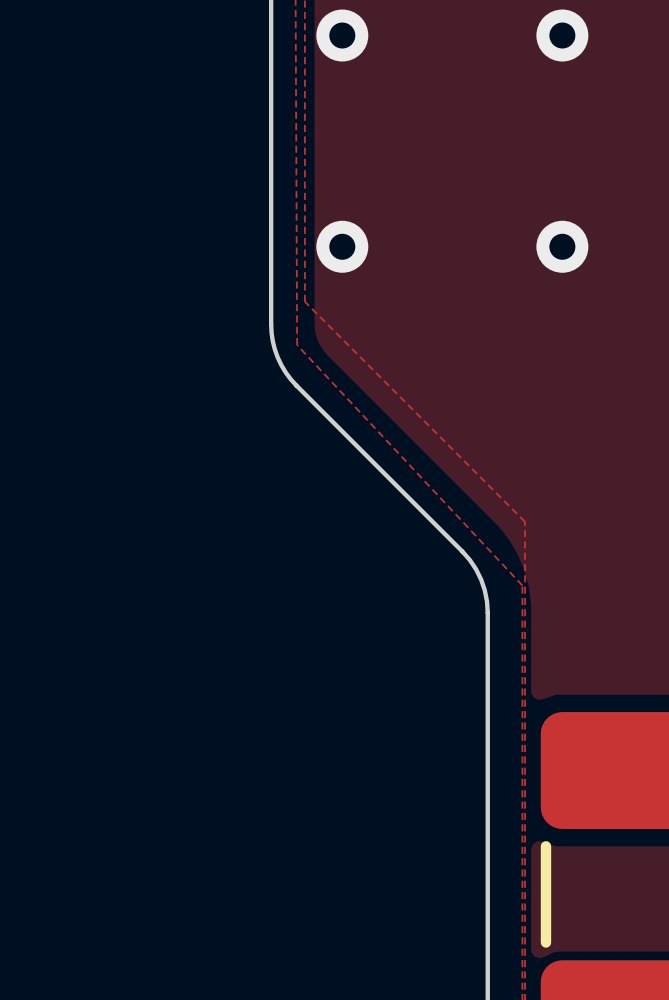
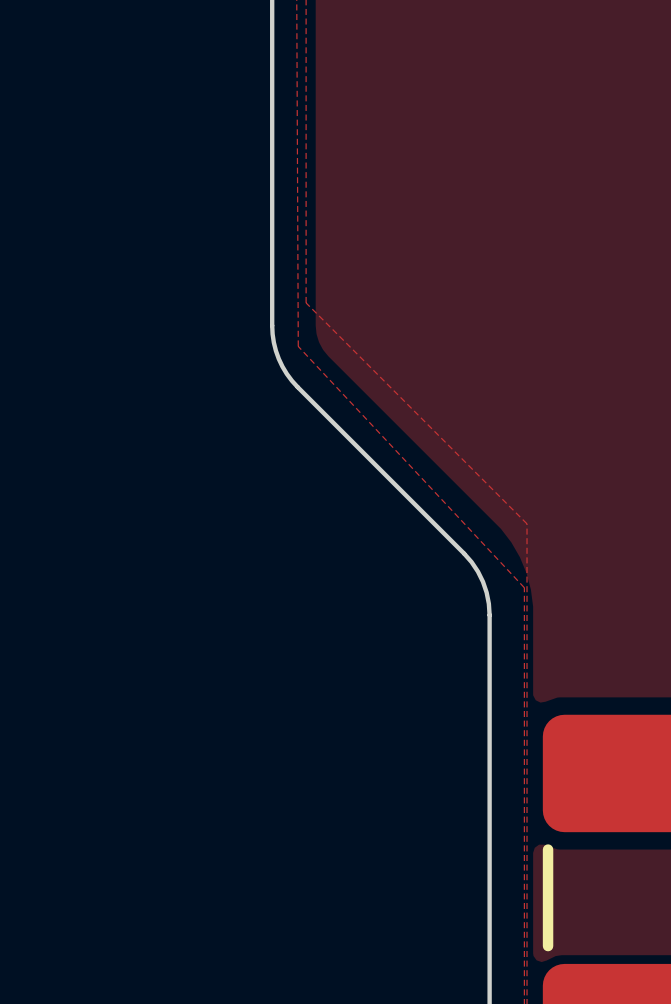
via: (342, 35) -> none
via: (562, 35) -> none
via: (342, 246) -> none
via: (562, 246) -> none

